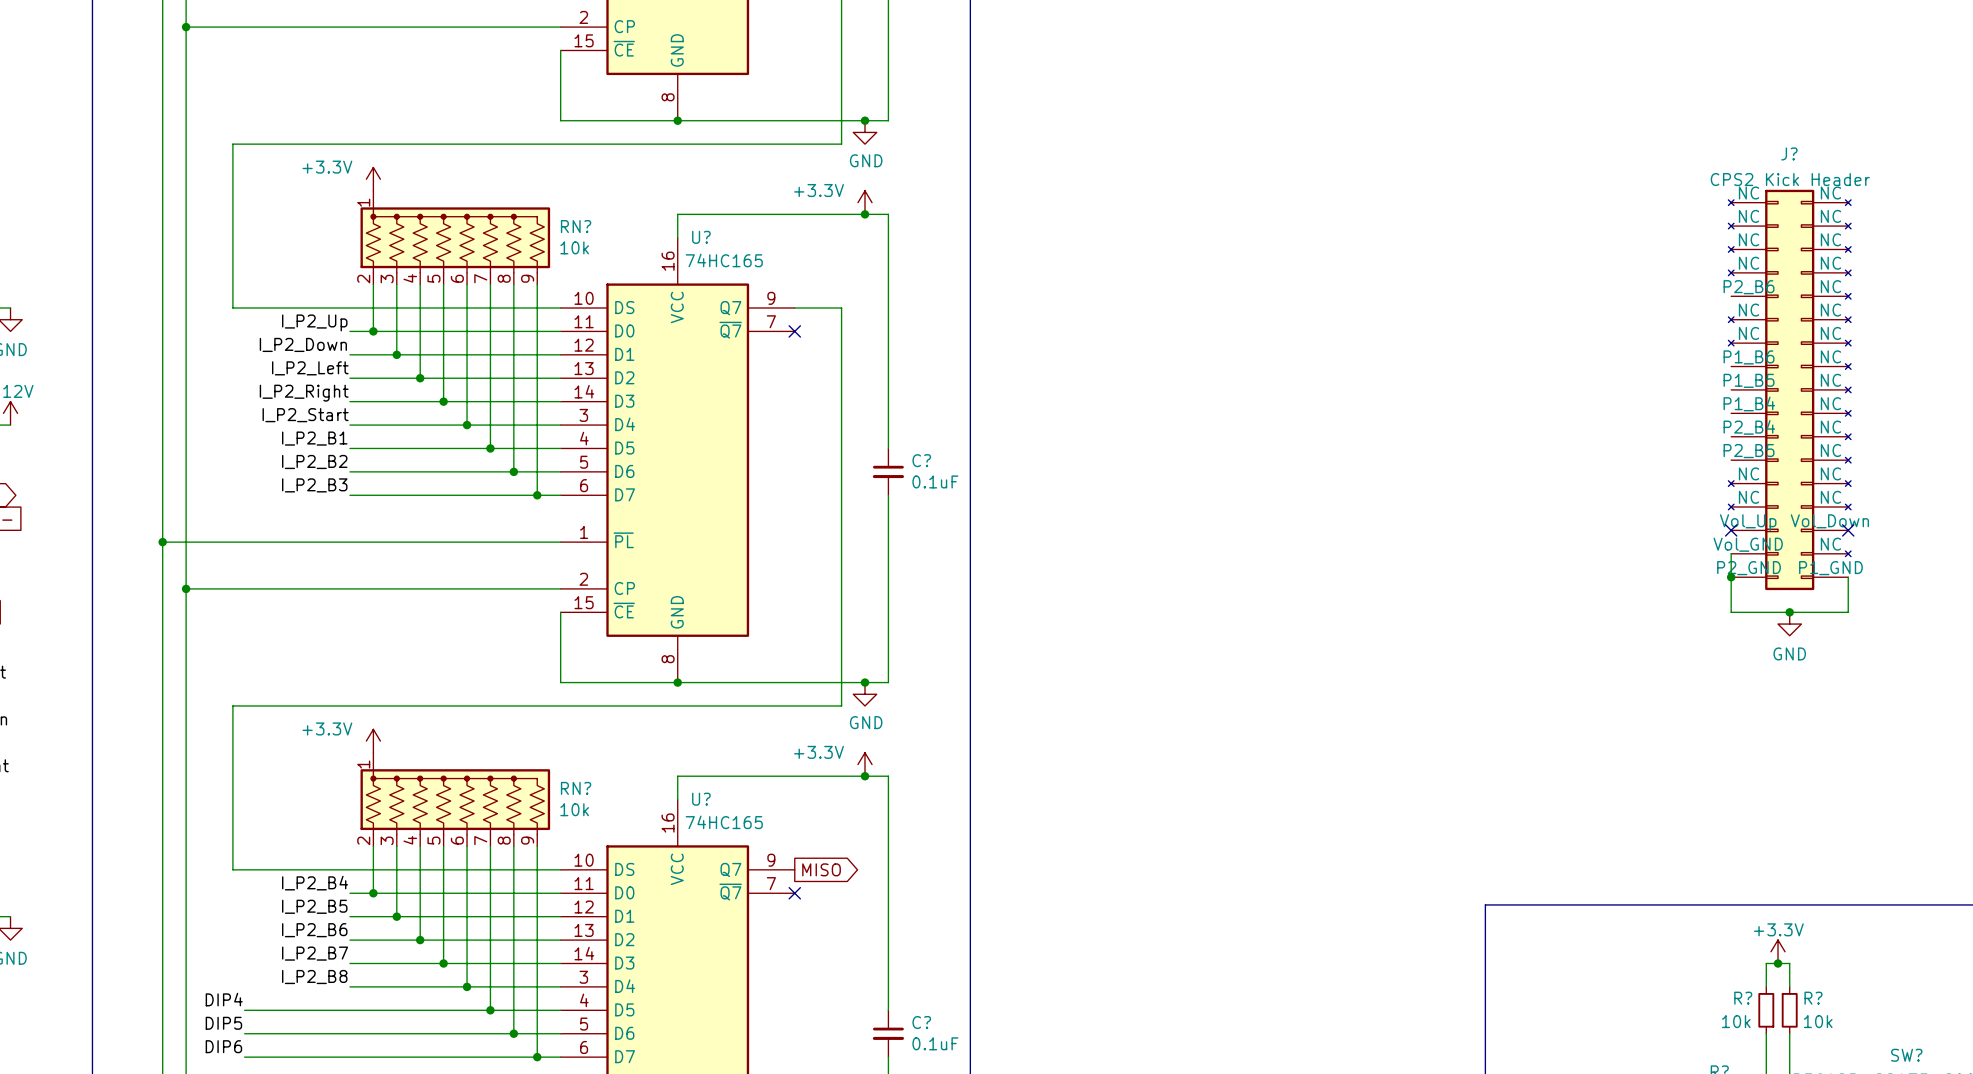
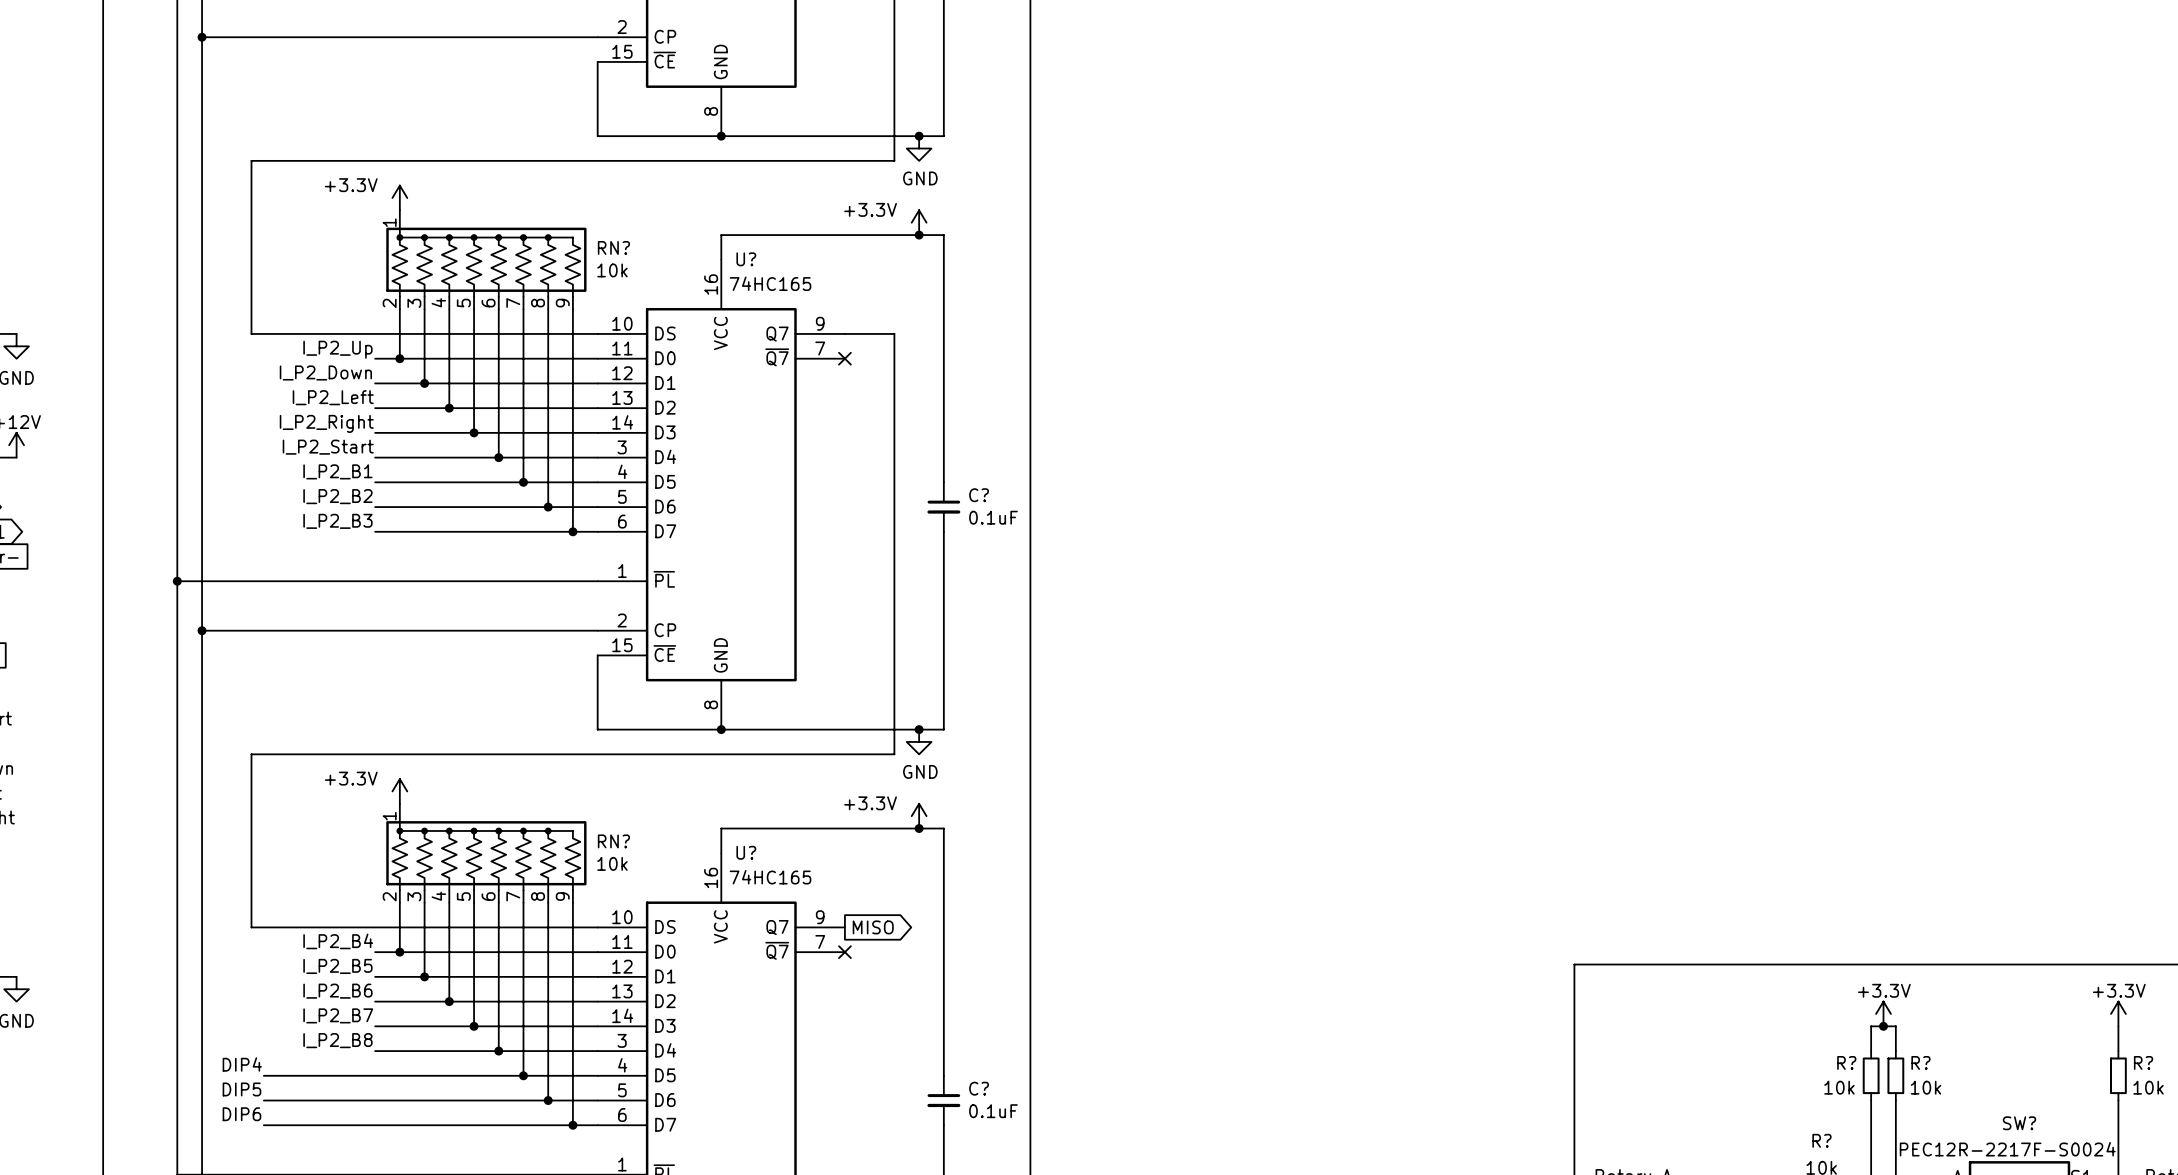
J?: CPS2 Kick Header (1789, 389) -> none
no-connect mark: (1731, 530) -> none
no-connect mark: (1848, 530) -> none
wire: (1731, 553) (1731, 612) (1848, 612) (1848, 577) -> none
junction: (1731, 577) -> none
junction: (1789, 612) -> none
power symbol: GND (1789, 624) -> none

